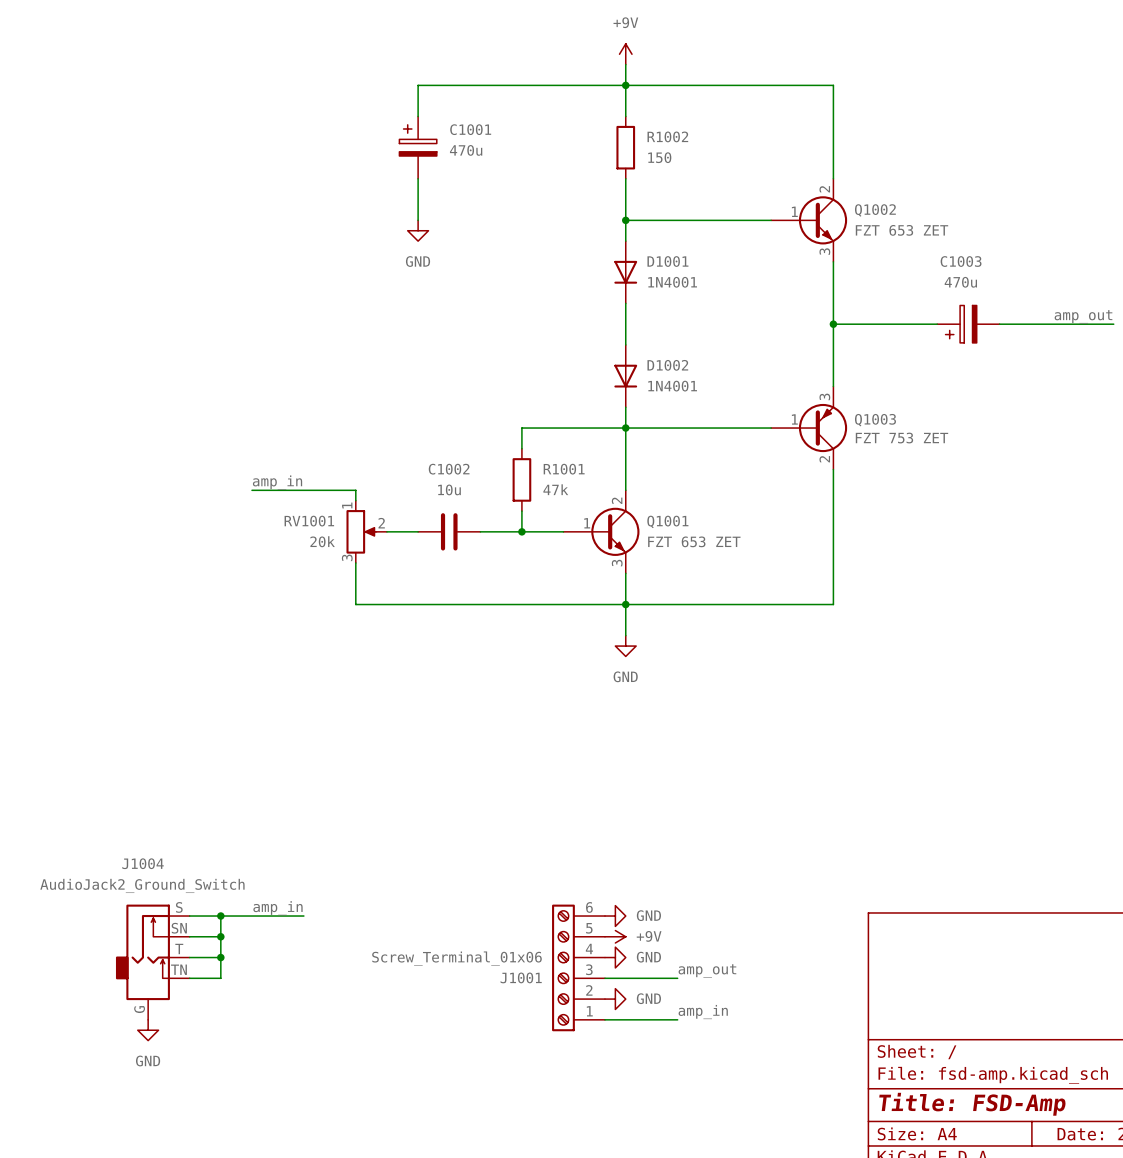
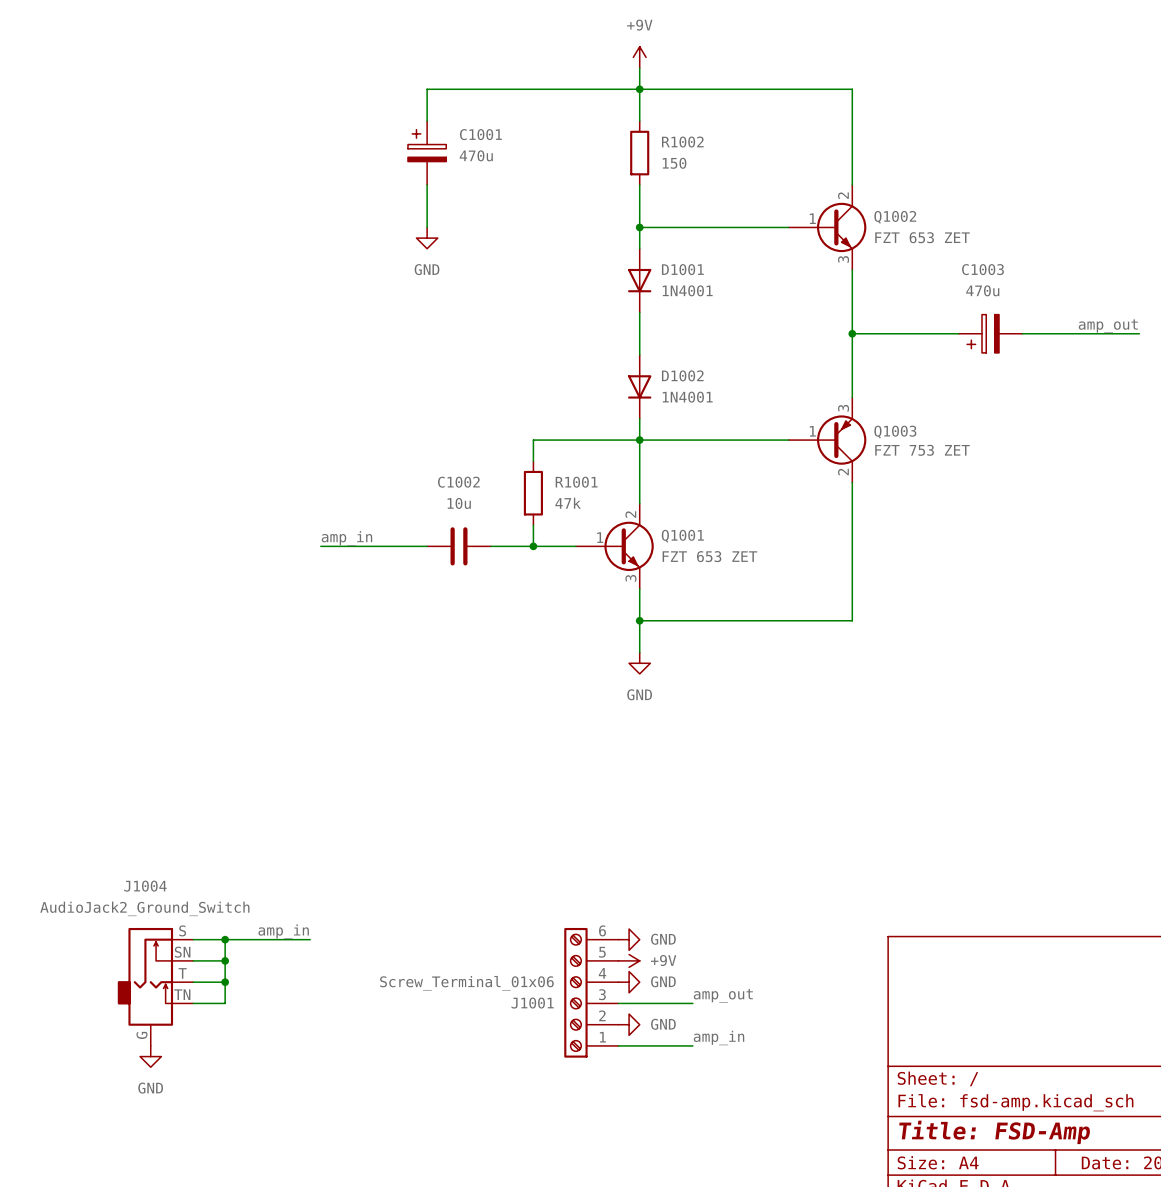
label position: amp_in (277, 482) -> amp_in (346, 538)
wire: (251, 490) (355, 490) (355, 500) -> none
wire: none -> (320, 546) (395, 546)
RV1001: 20k (366, 531) -> none
wire: (355, 563) (355, 604) (625, 604) -> none

